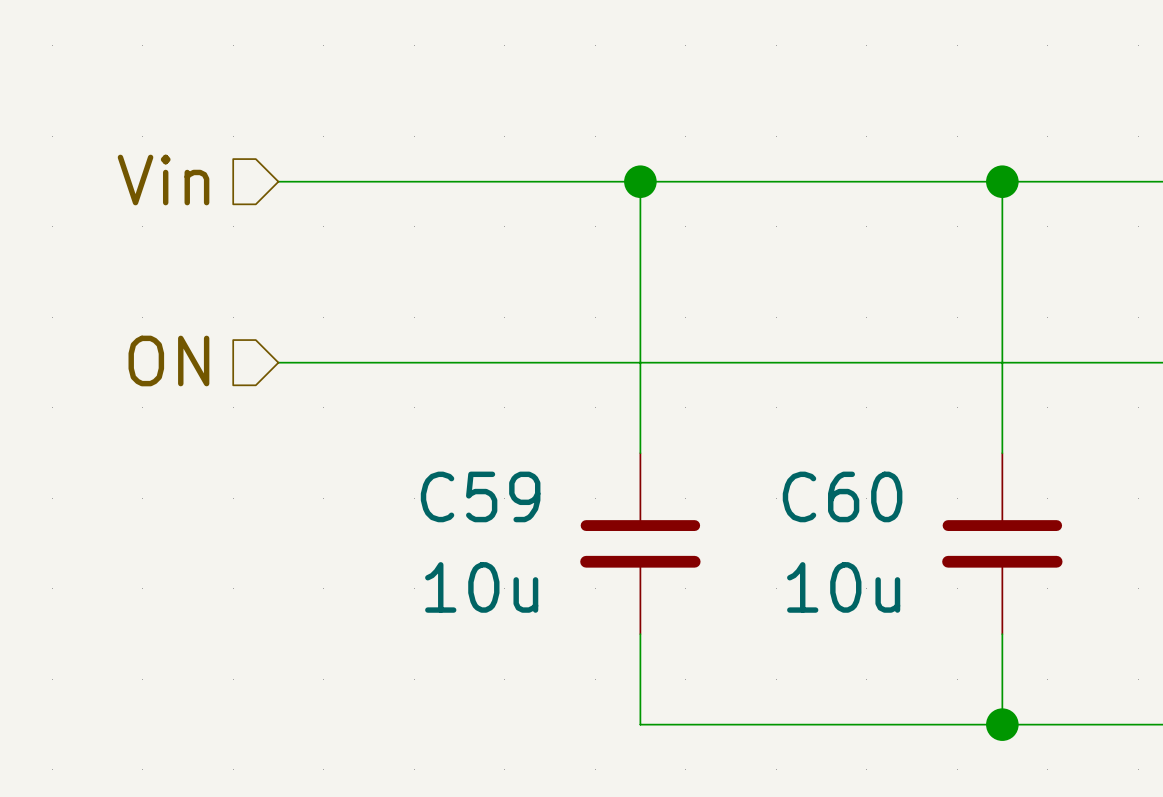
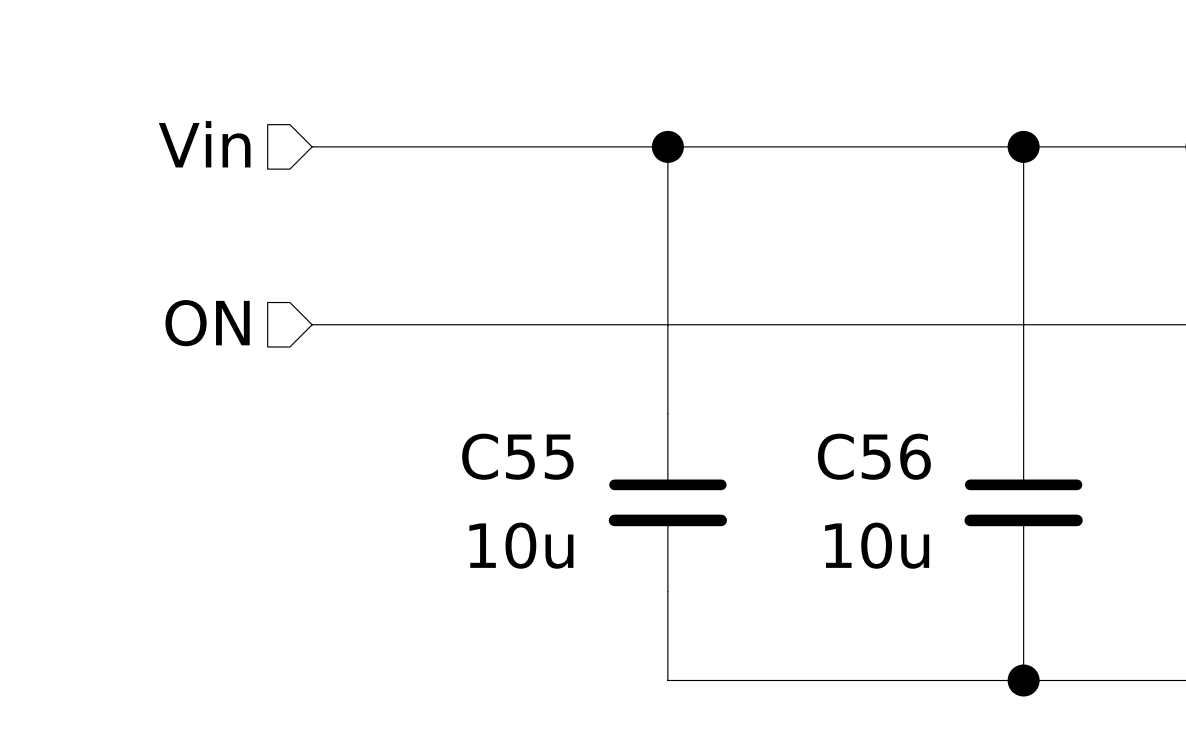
C59 name: C59 (480, 496) -> C55 (517, 456)
C60 name: C60 (842, 496) -> C56 (874, 456)

